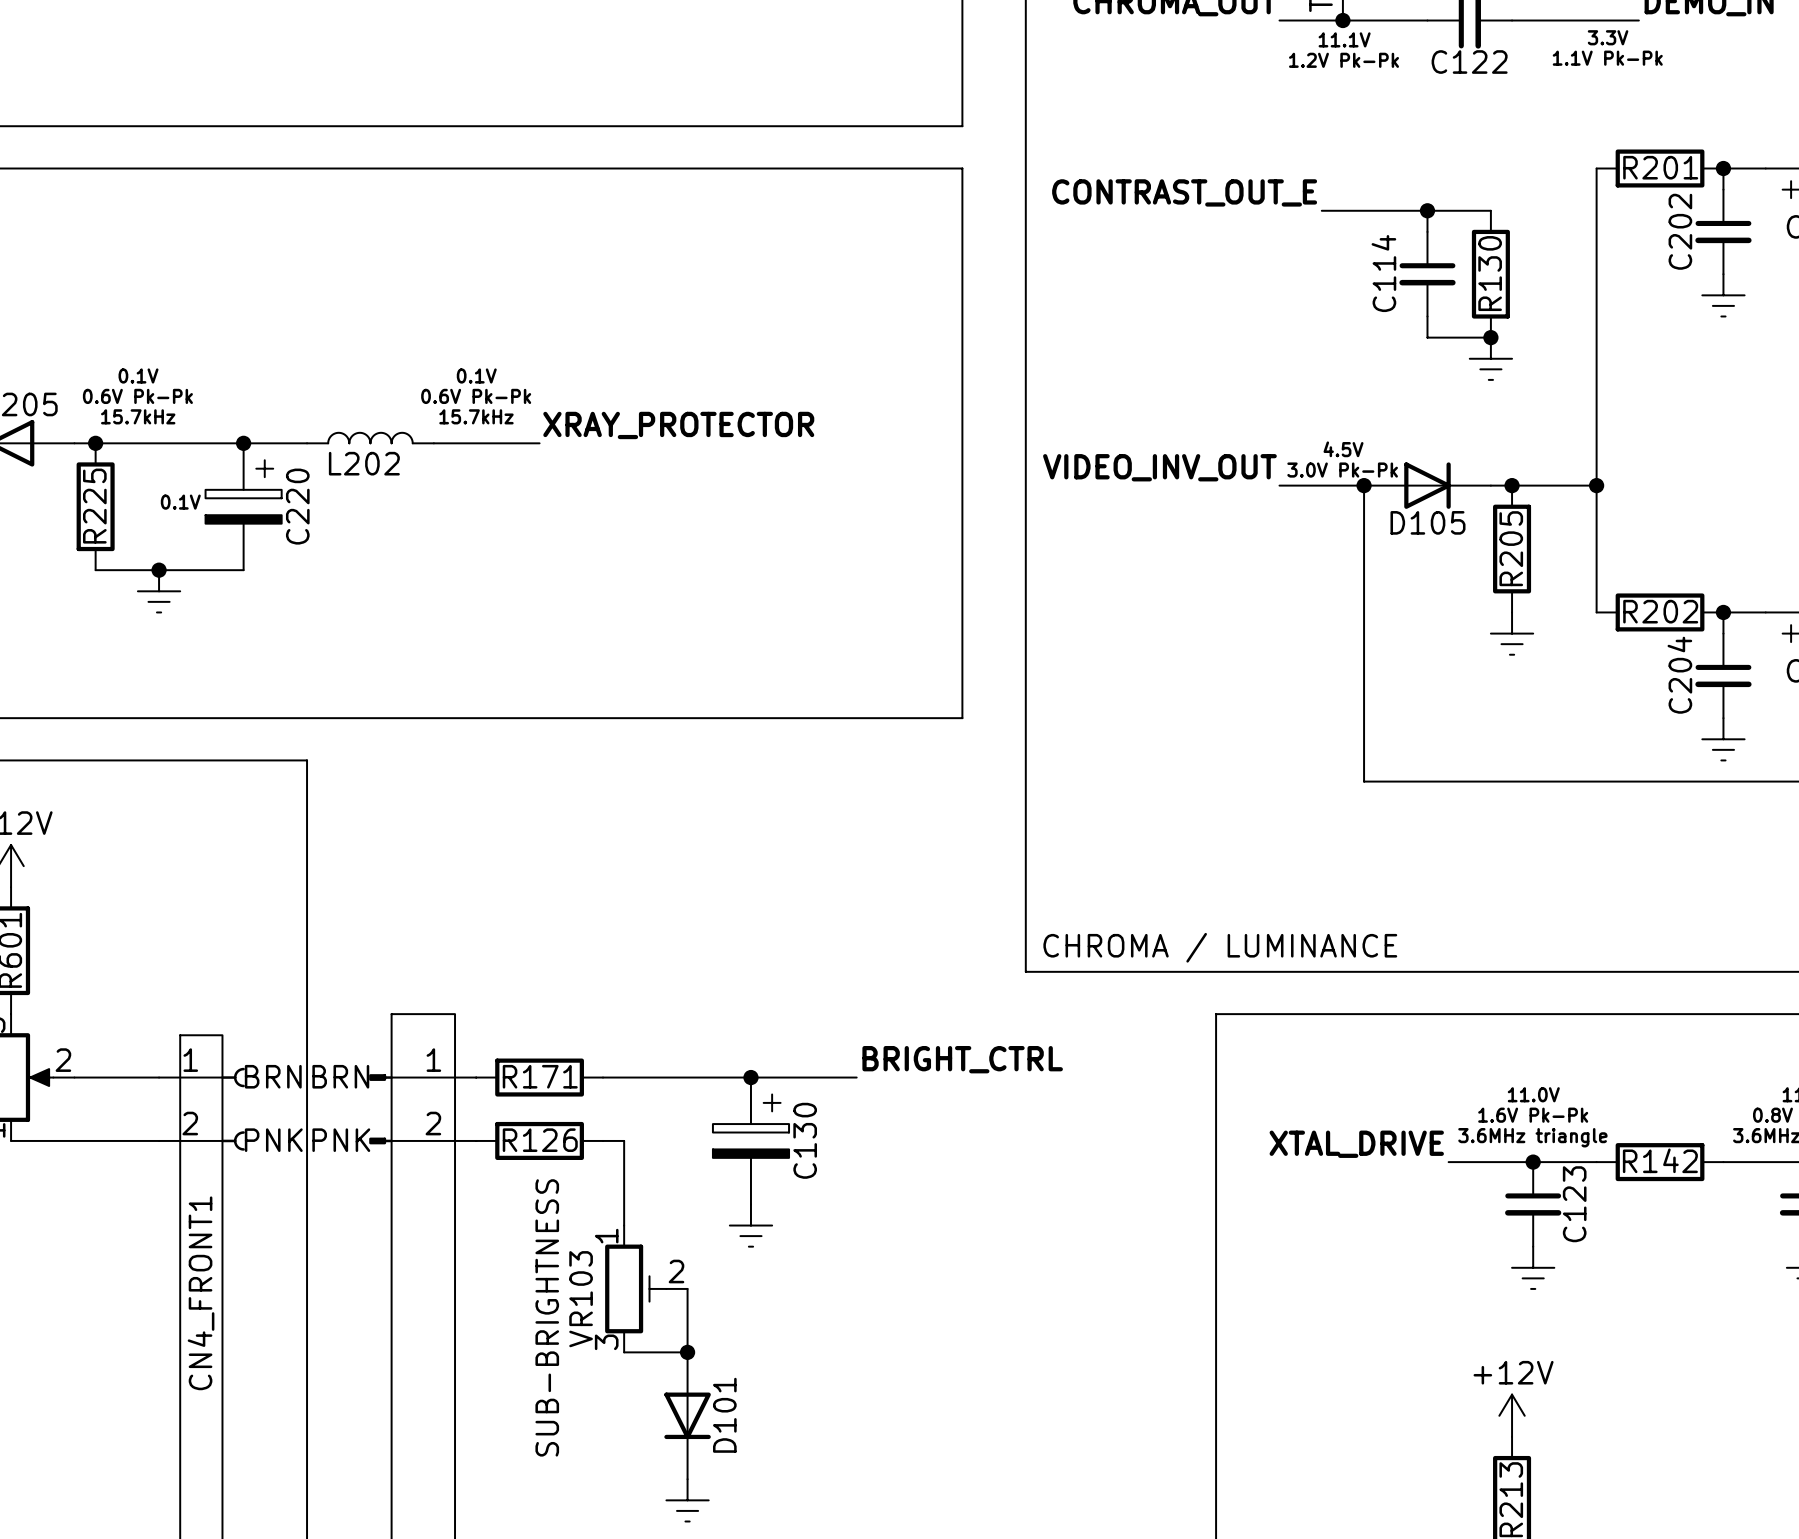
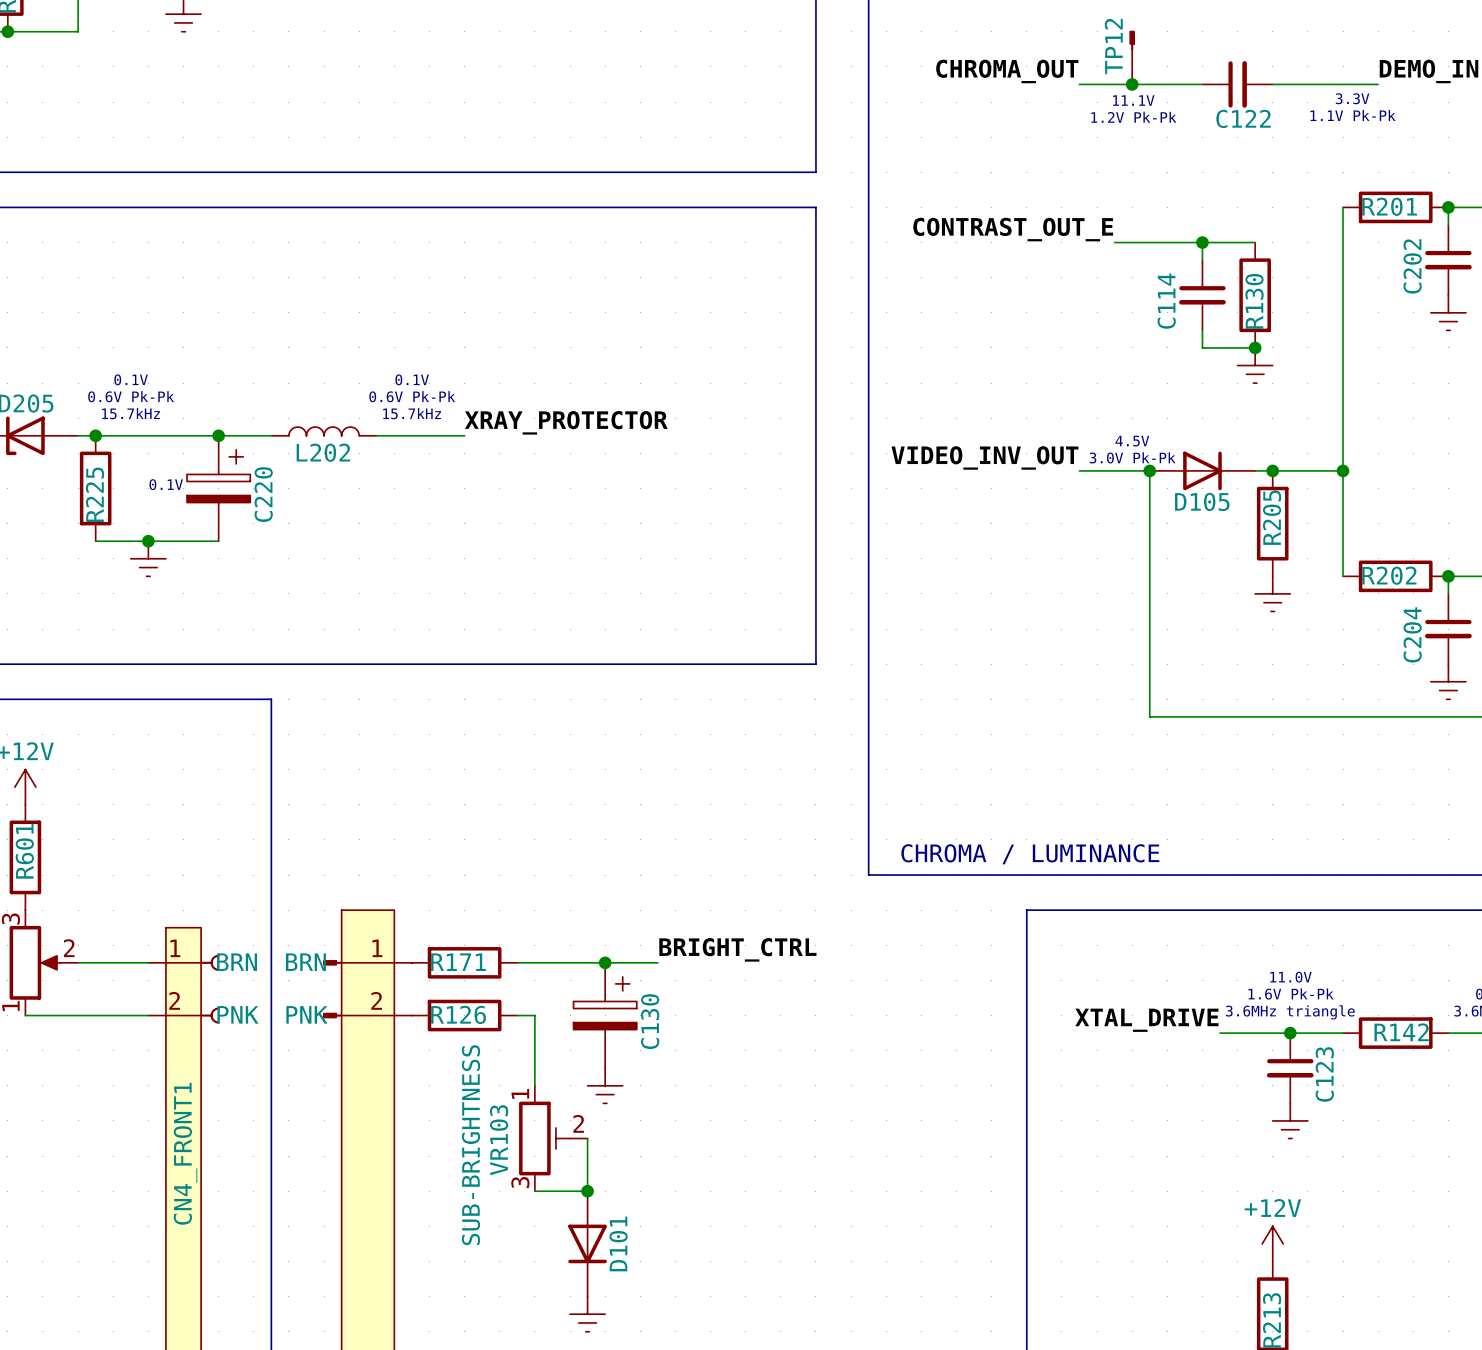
label position: BRIGHT_CTRL (962, 1059) -> BRIGHT_CTRL (737, 949)
junction position: (750, 1077) -> (605, 962)
wire: (772, 1077) (856, 1077) -> none
C130 position: (750, 1140) -> (605, 1015)
power symbol position: (750, 1225) -> (605, 1085)

